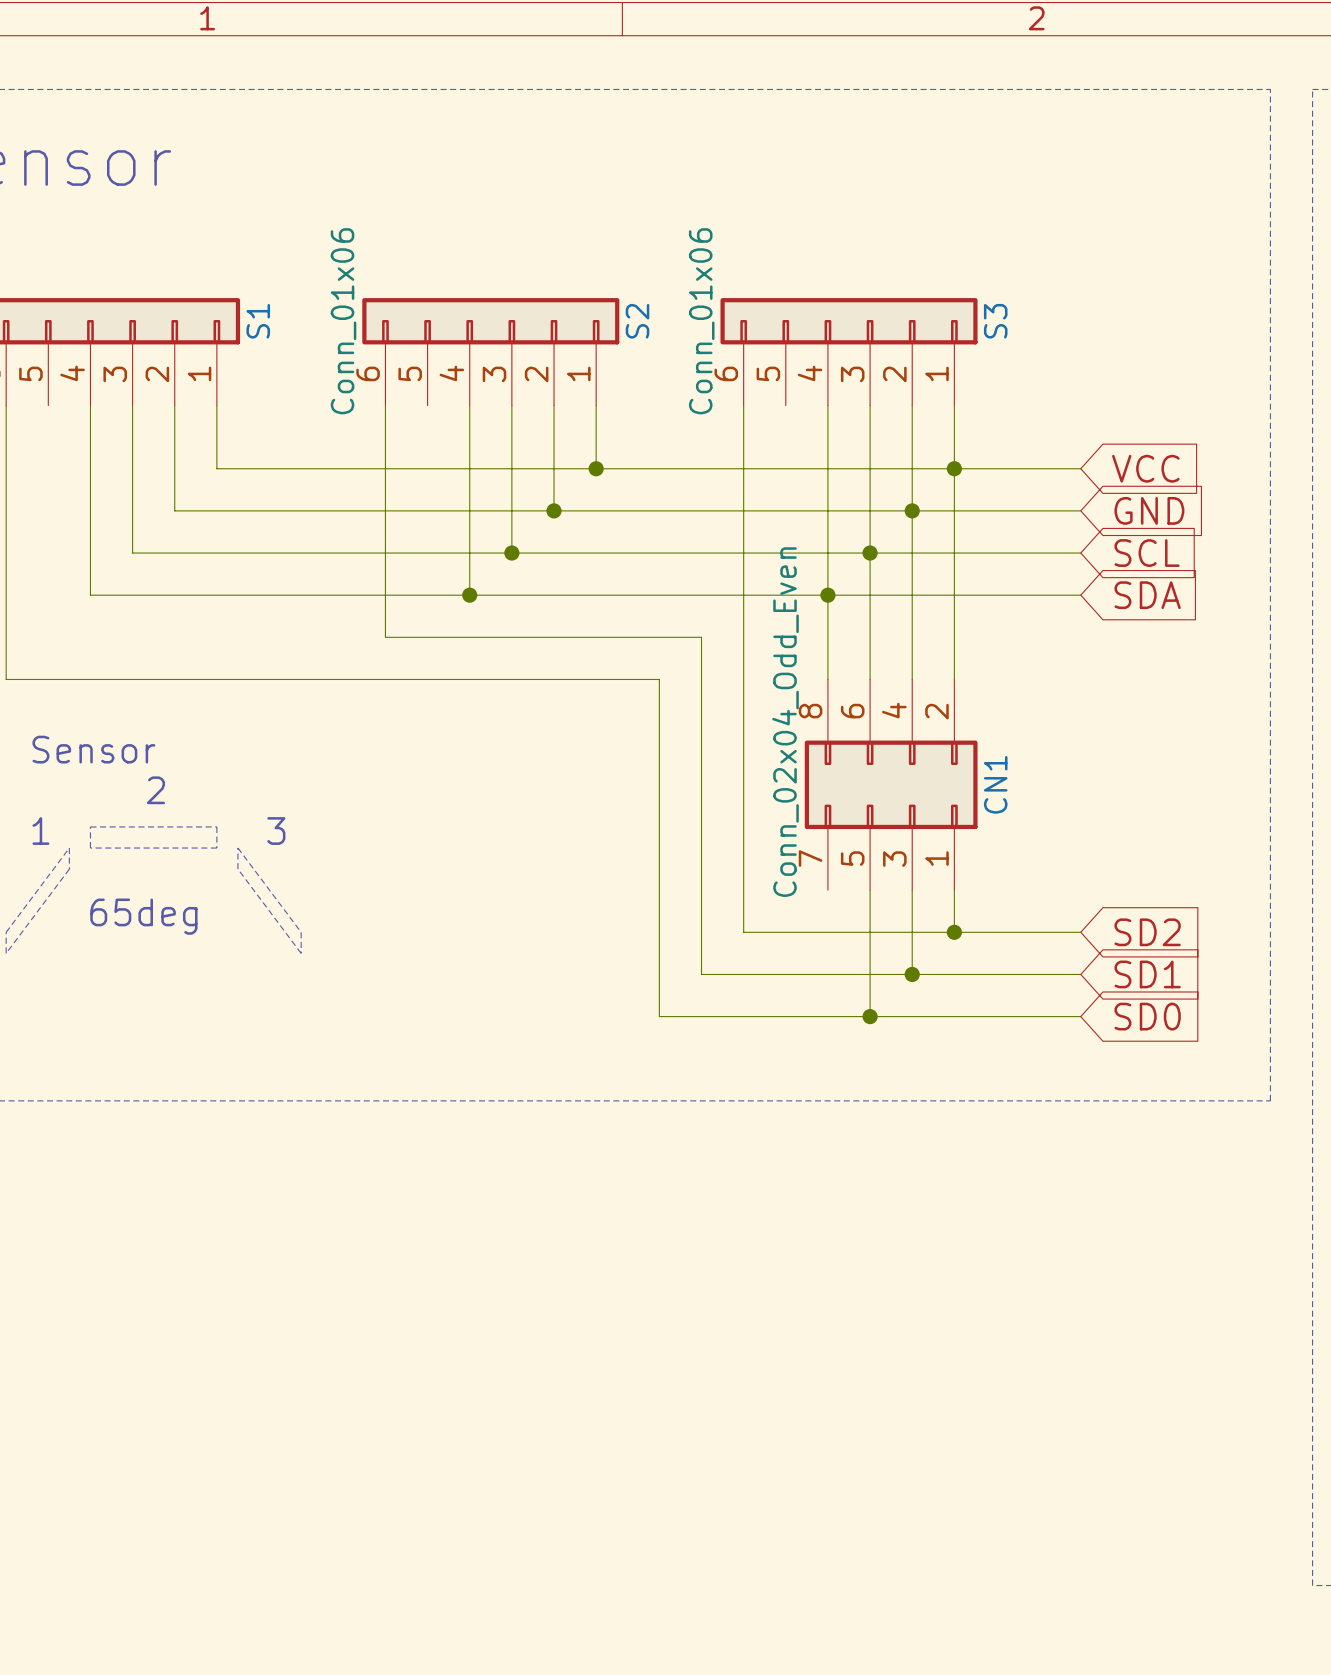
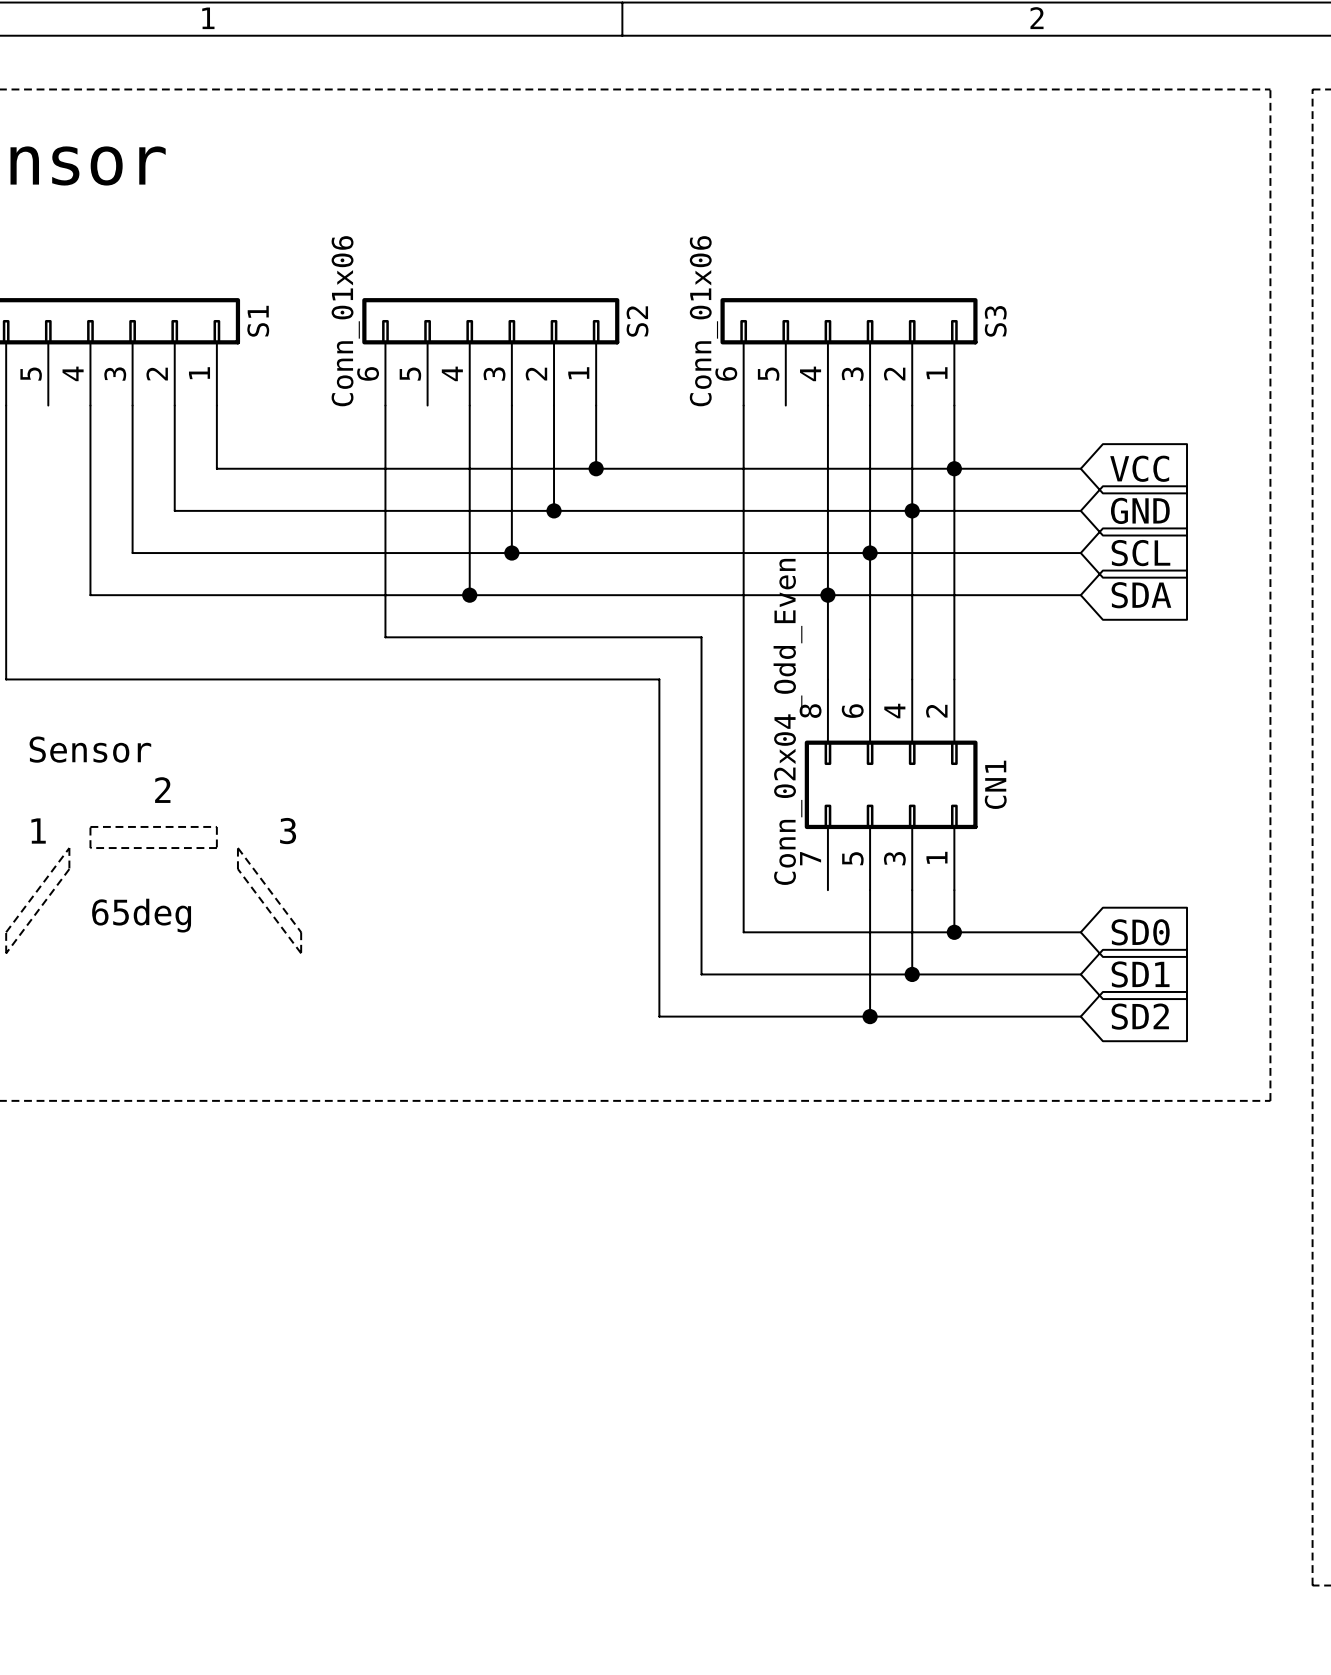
global label: SD2 (1147, 932) -> SD0 (1140, 932)
global label: SD0 (1147, 1016) -> SD2 (1140, 1016)

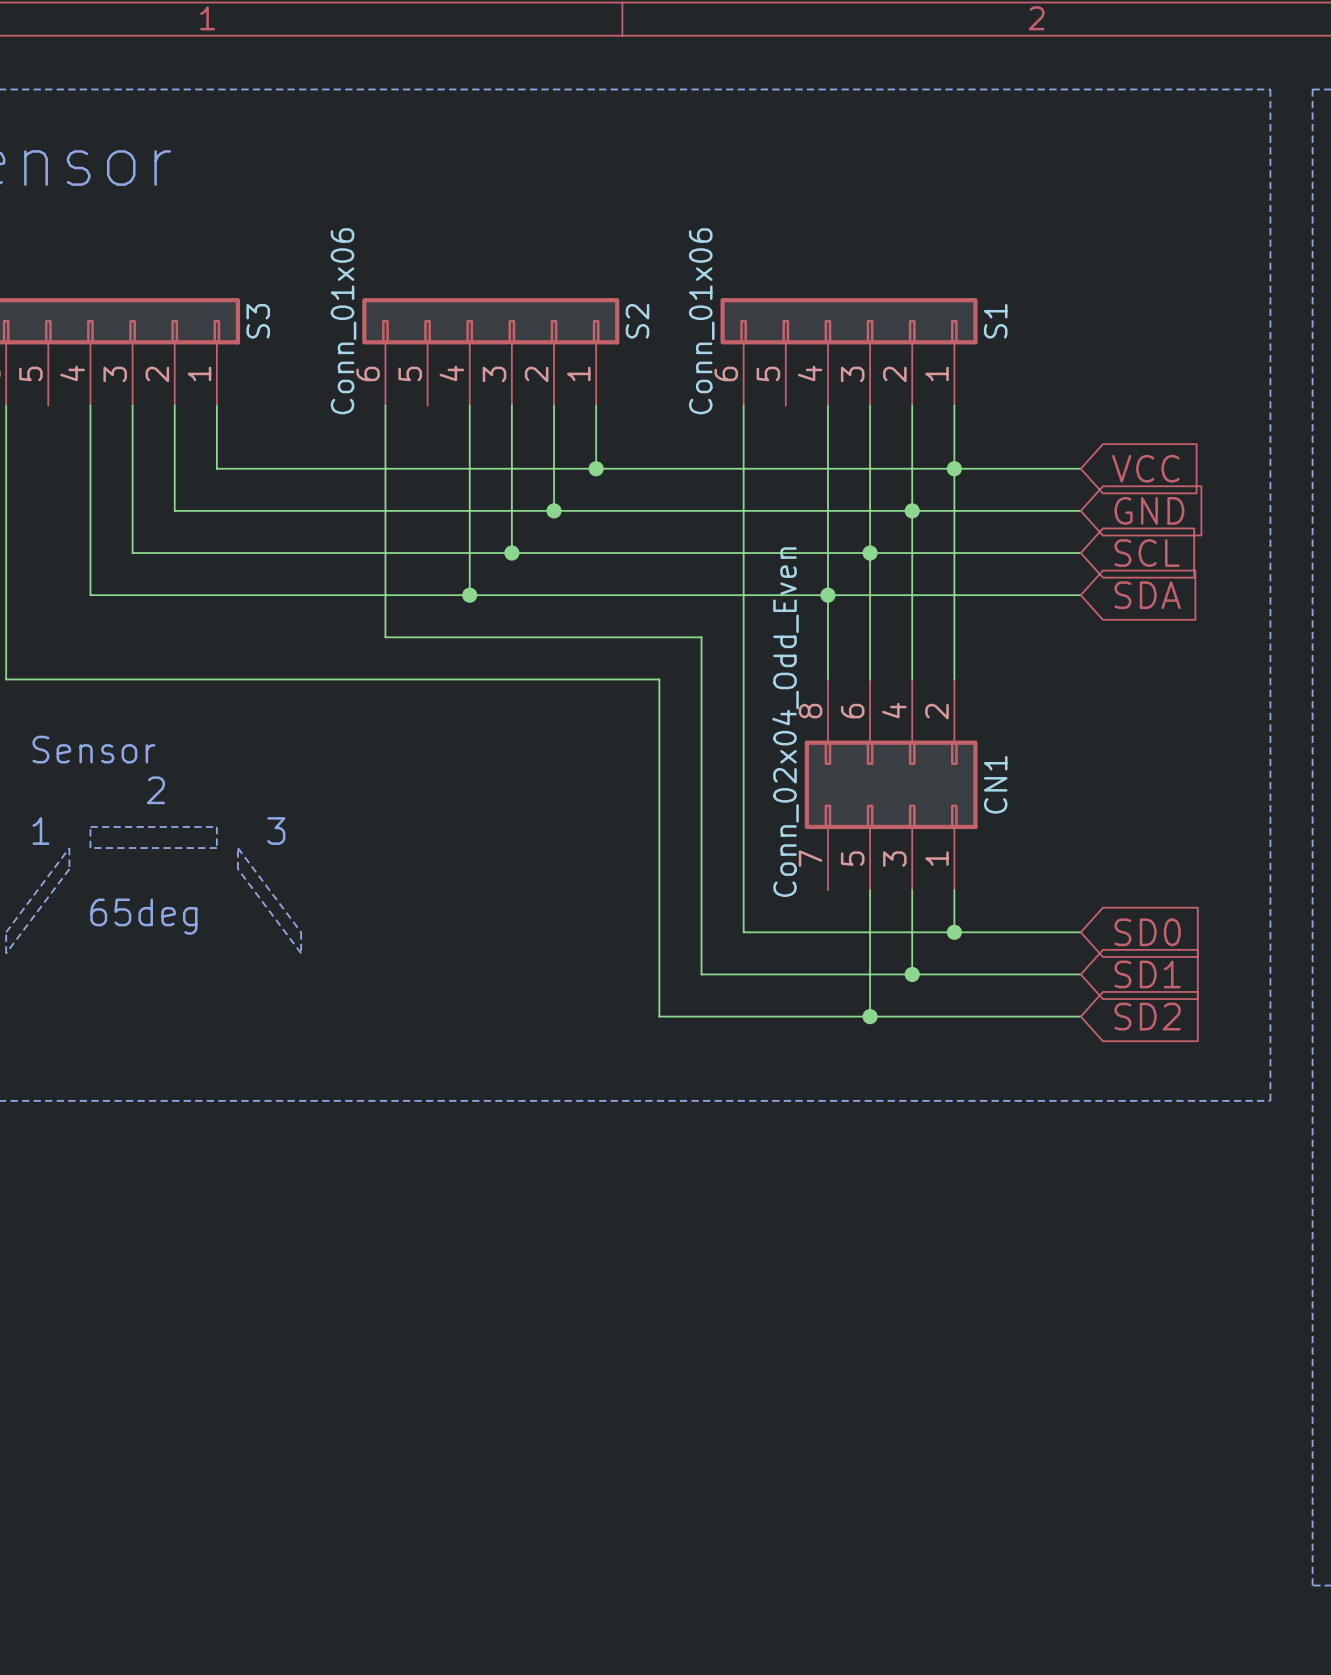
S1 name: S1 (258, 321) -> S3 (258, 321)
S3 name: S3 (995, 321) -> S1 (995, 321)

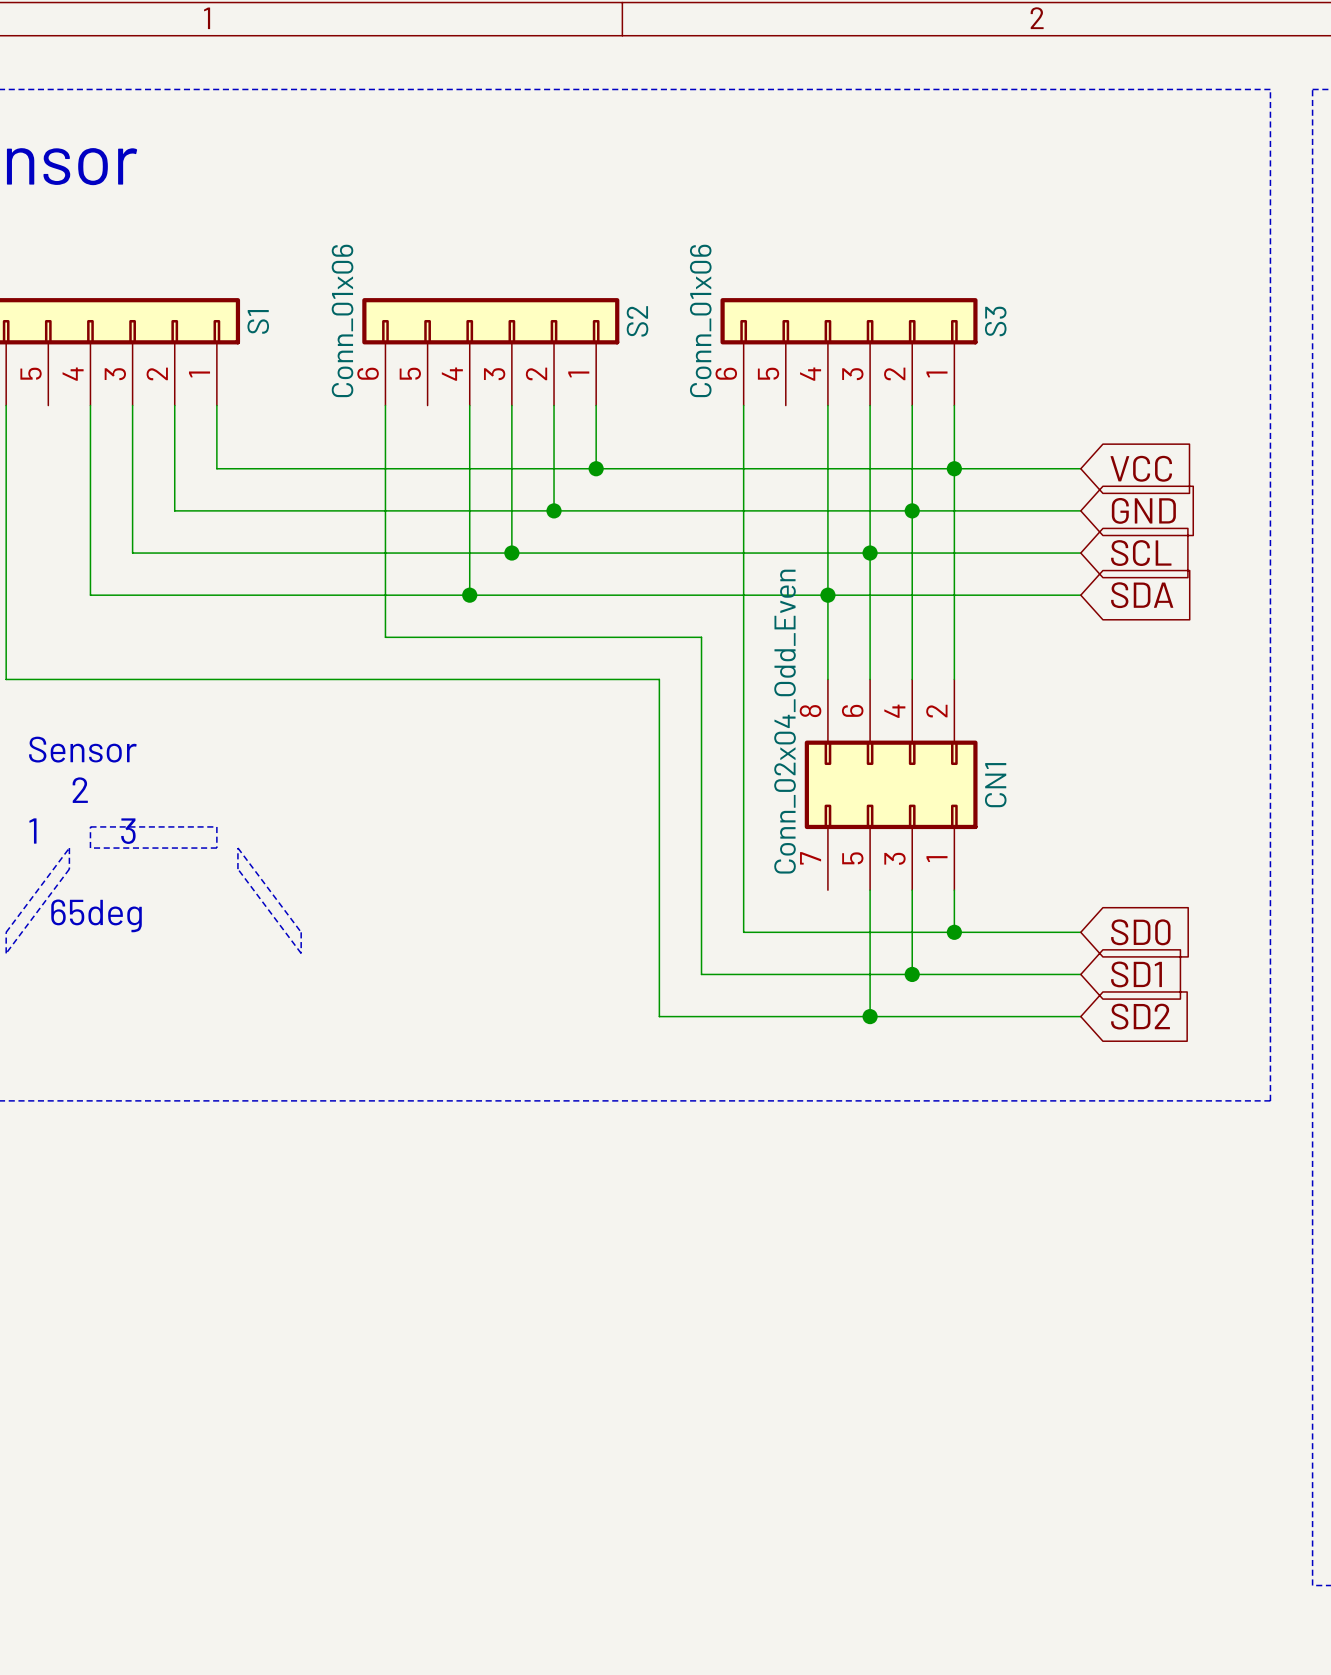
S3 name: S3 (258, 321) -> S1 (258, 321)
S1 name: S1 (995, 321) -> S3 (995, 321)

